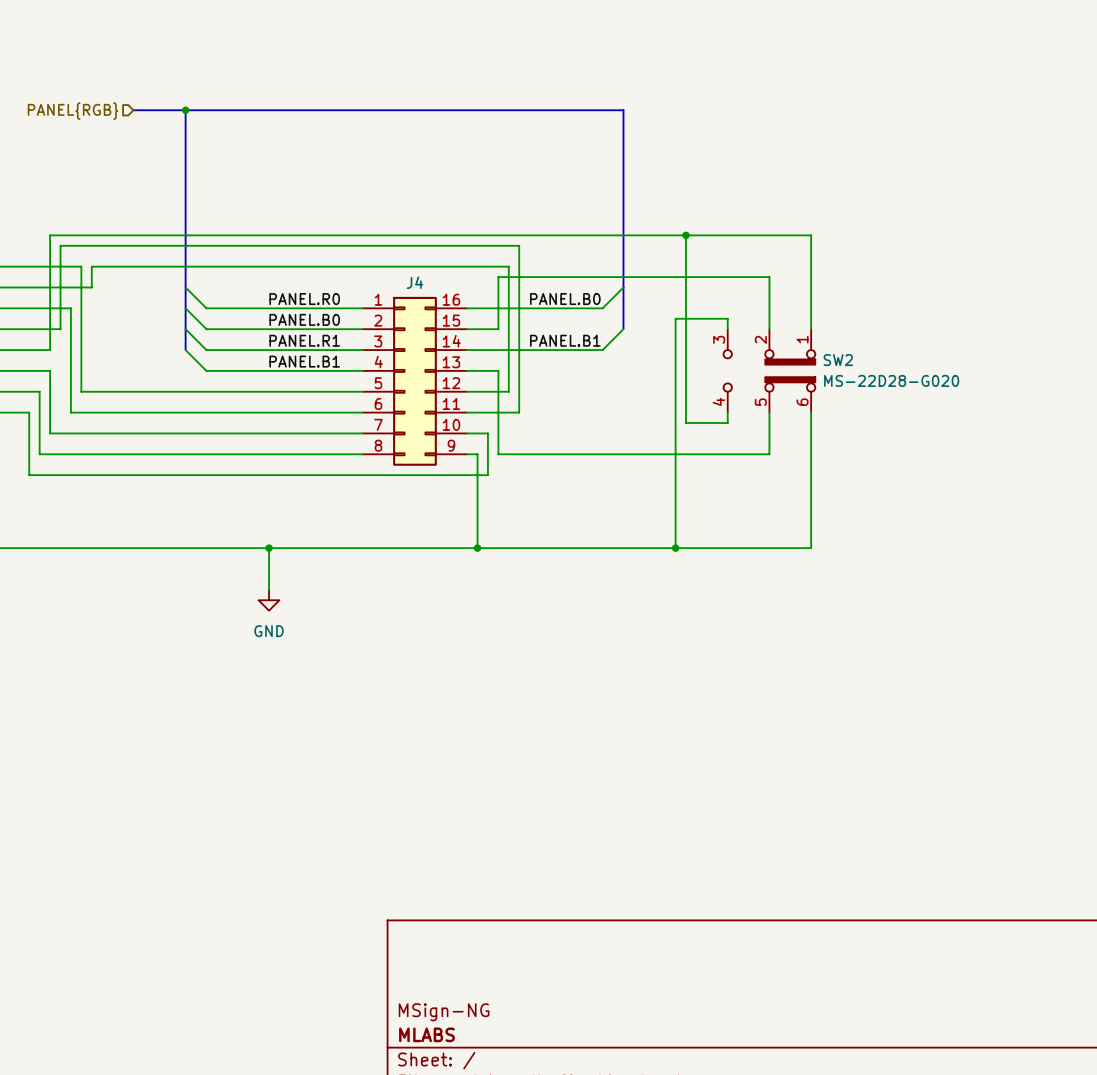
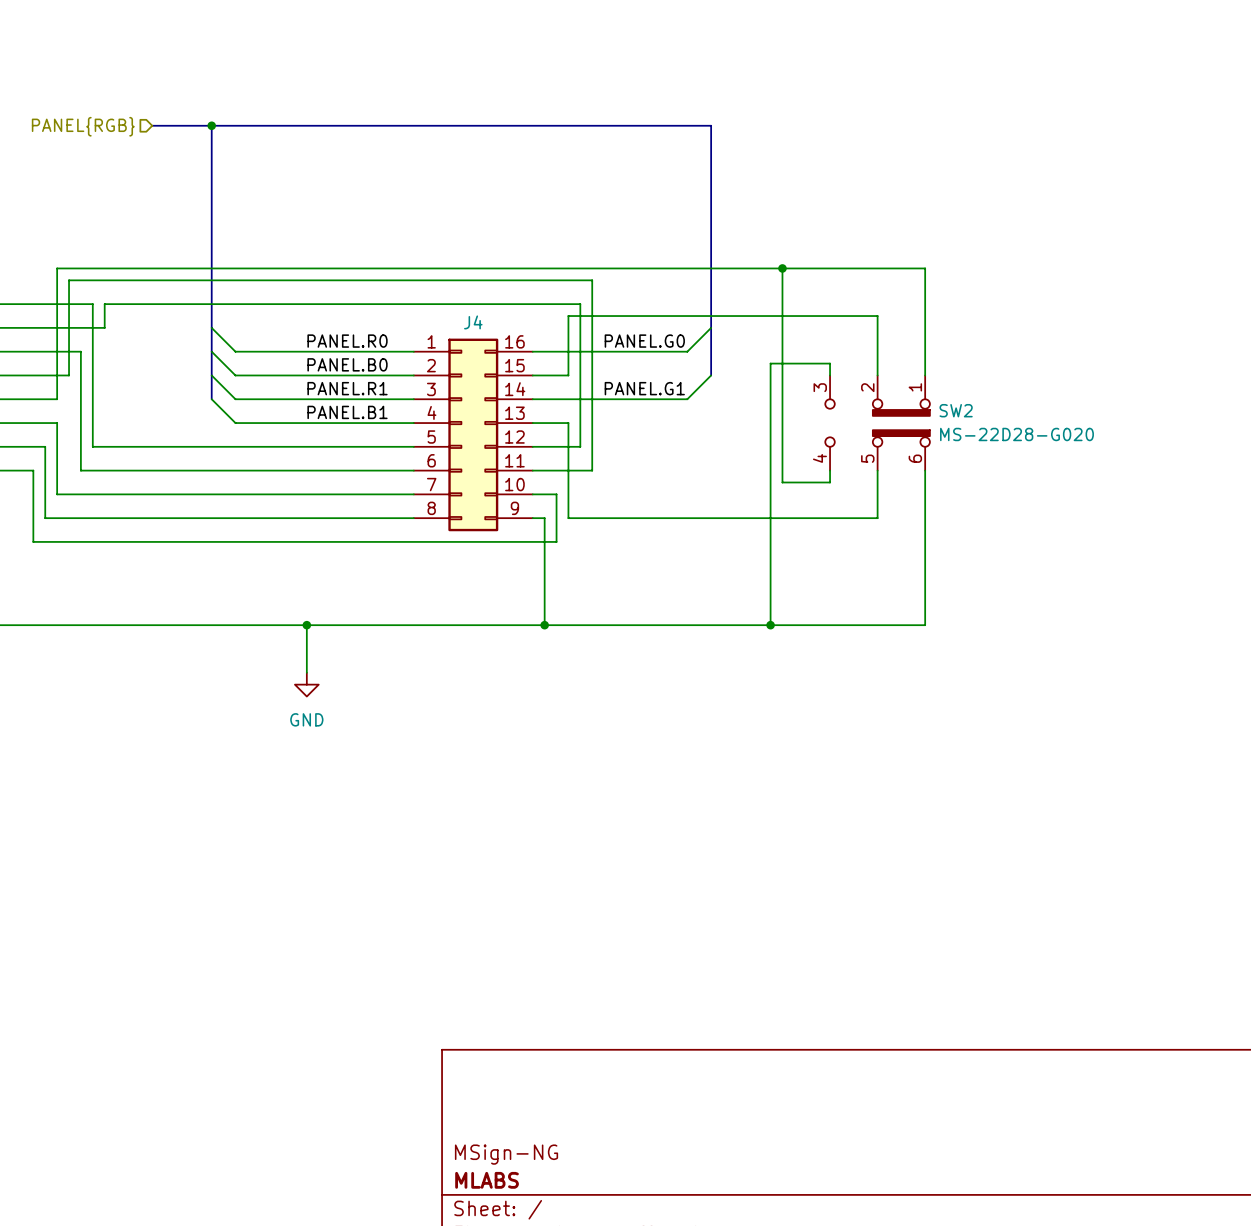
label: PANEL.B0 (565, 299) -> PANEL.G0 (644, 341)
label: PANEL.B1 (565, 340) -> PANEL.G1 (644, 388)

